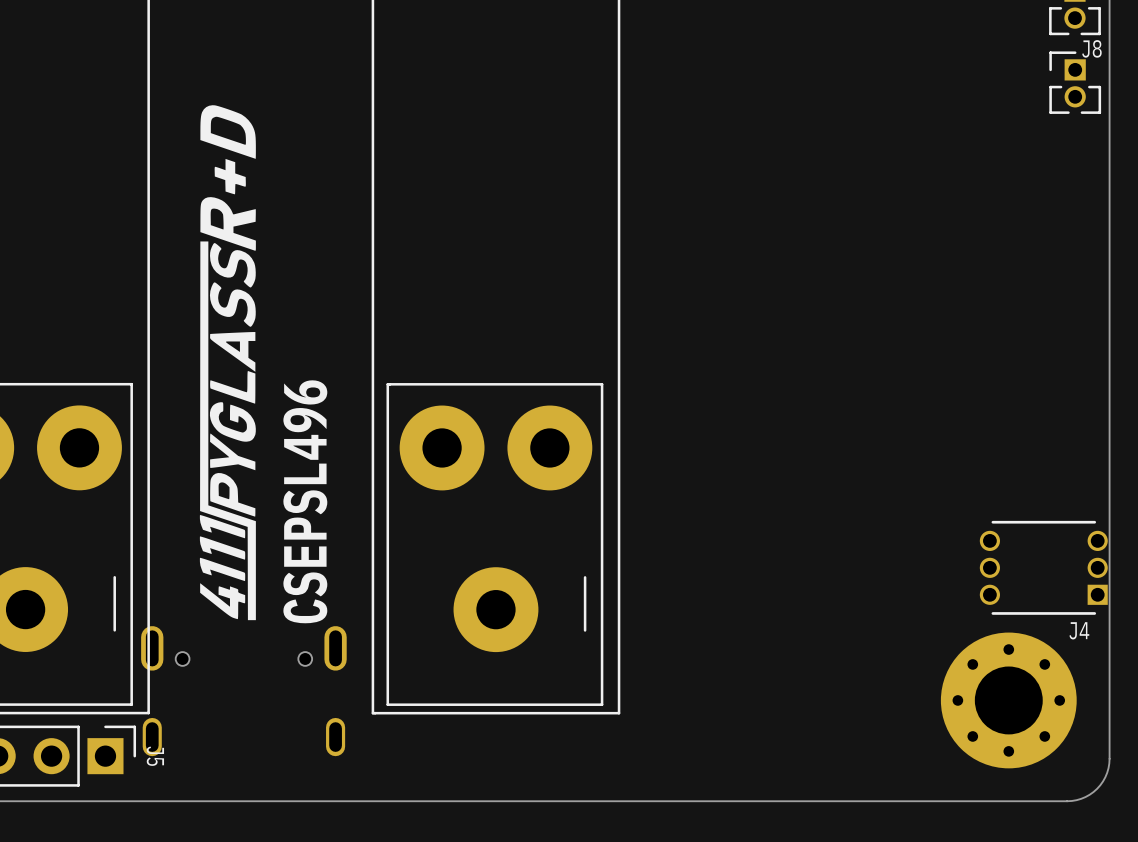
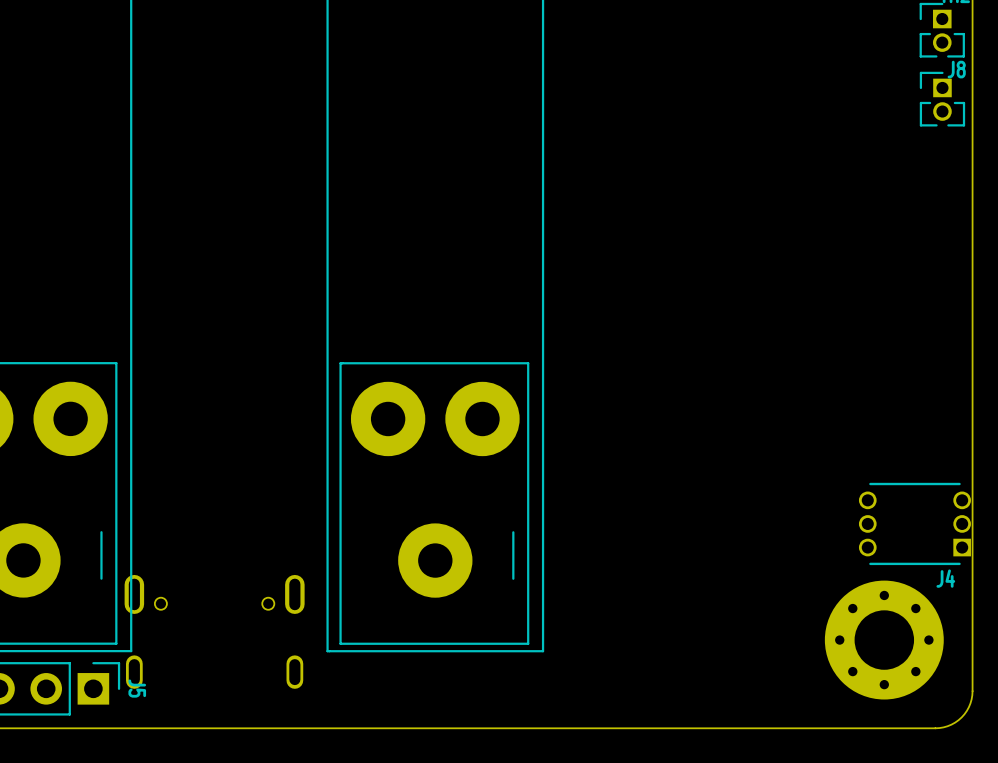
drawing: [199, 105, 256, 621] -> none
text: CSEPSL496 (305, 501) -> none

